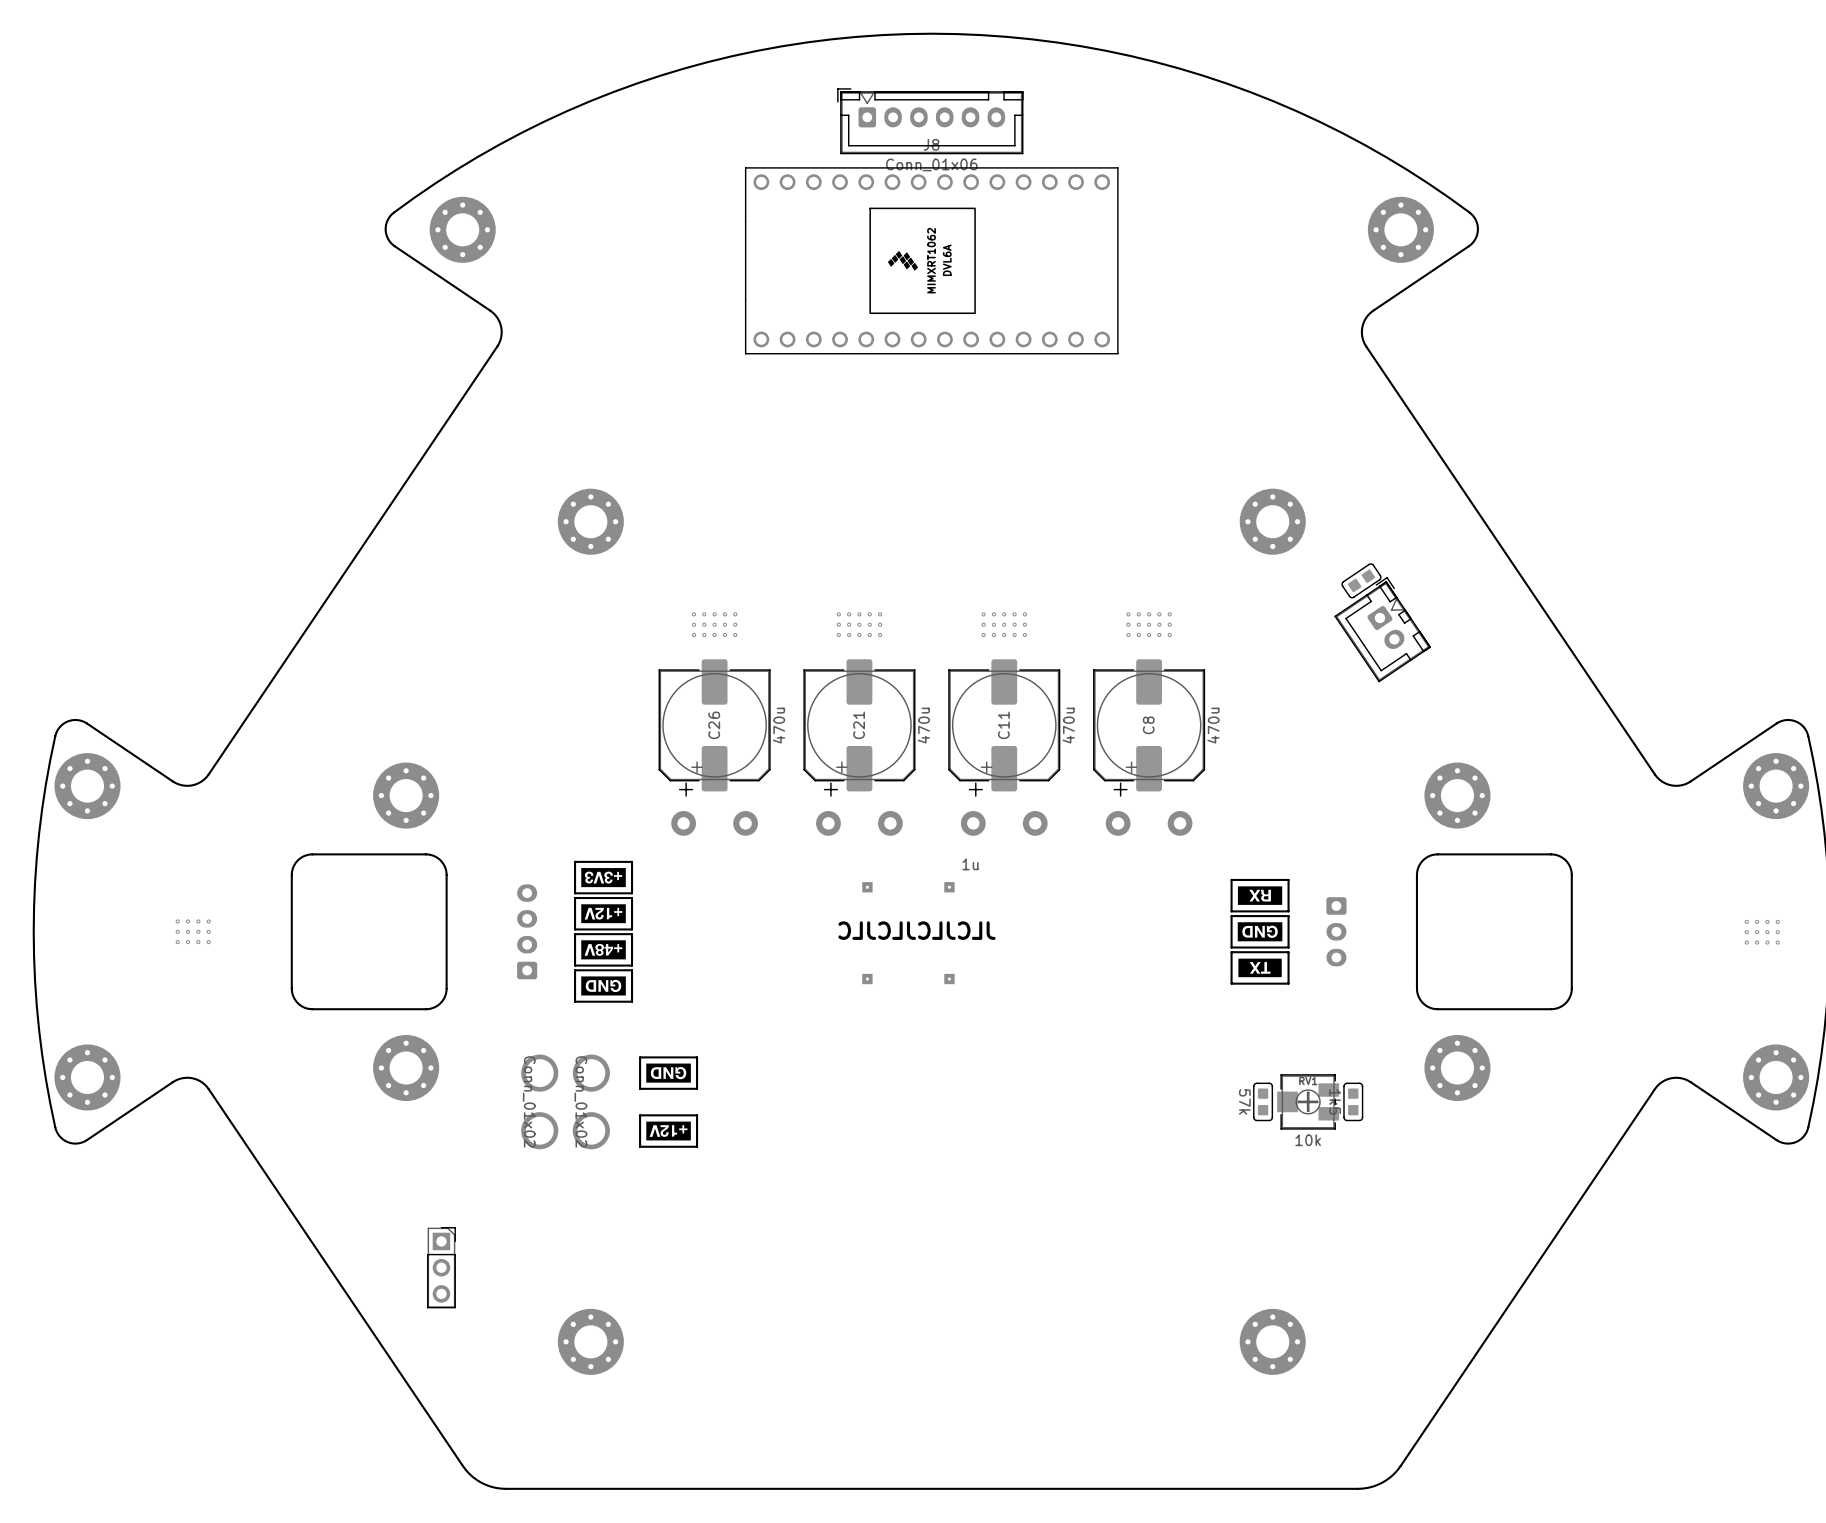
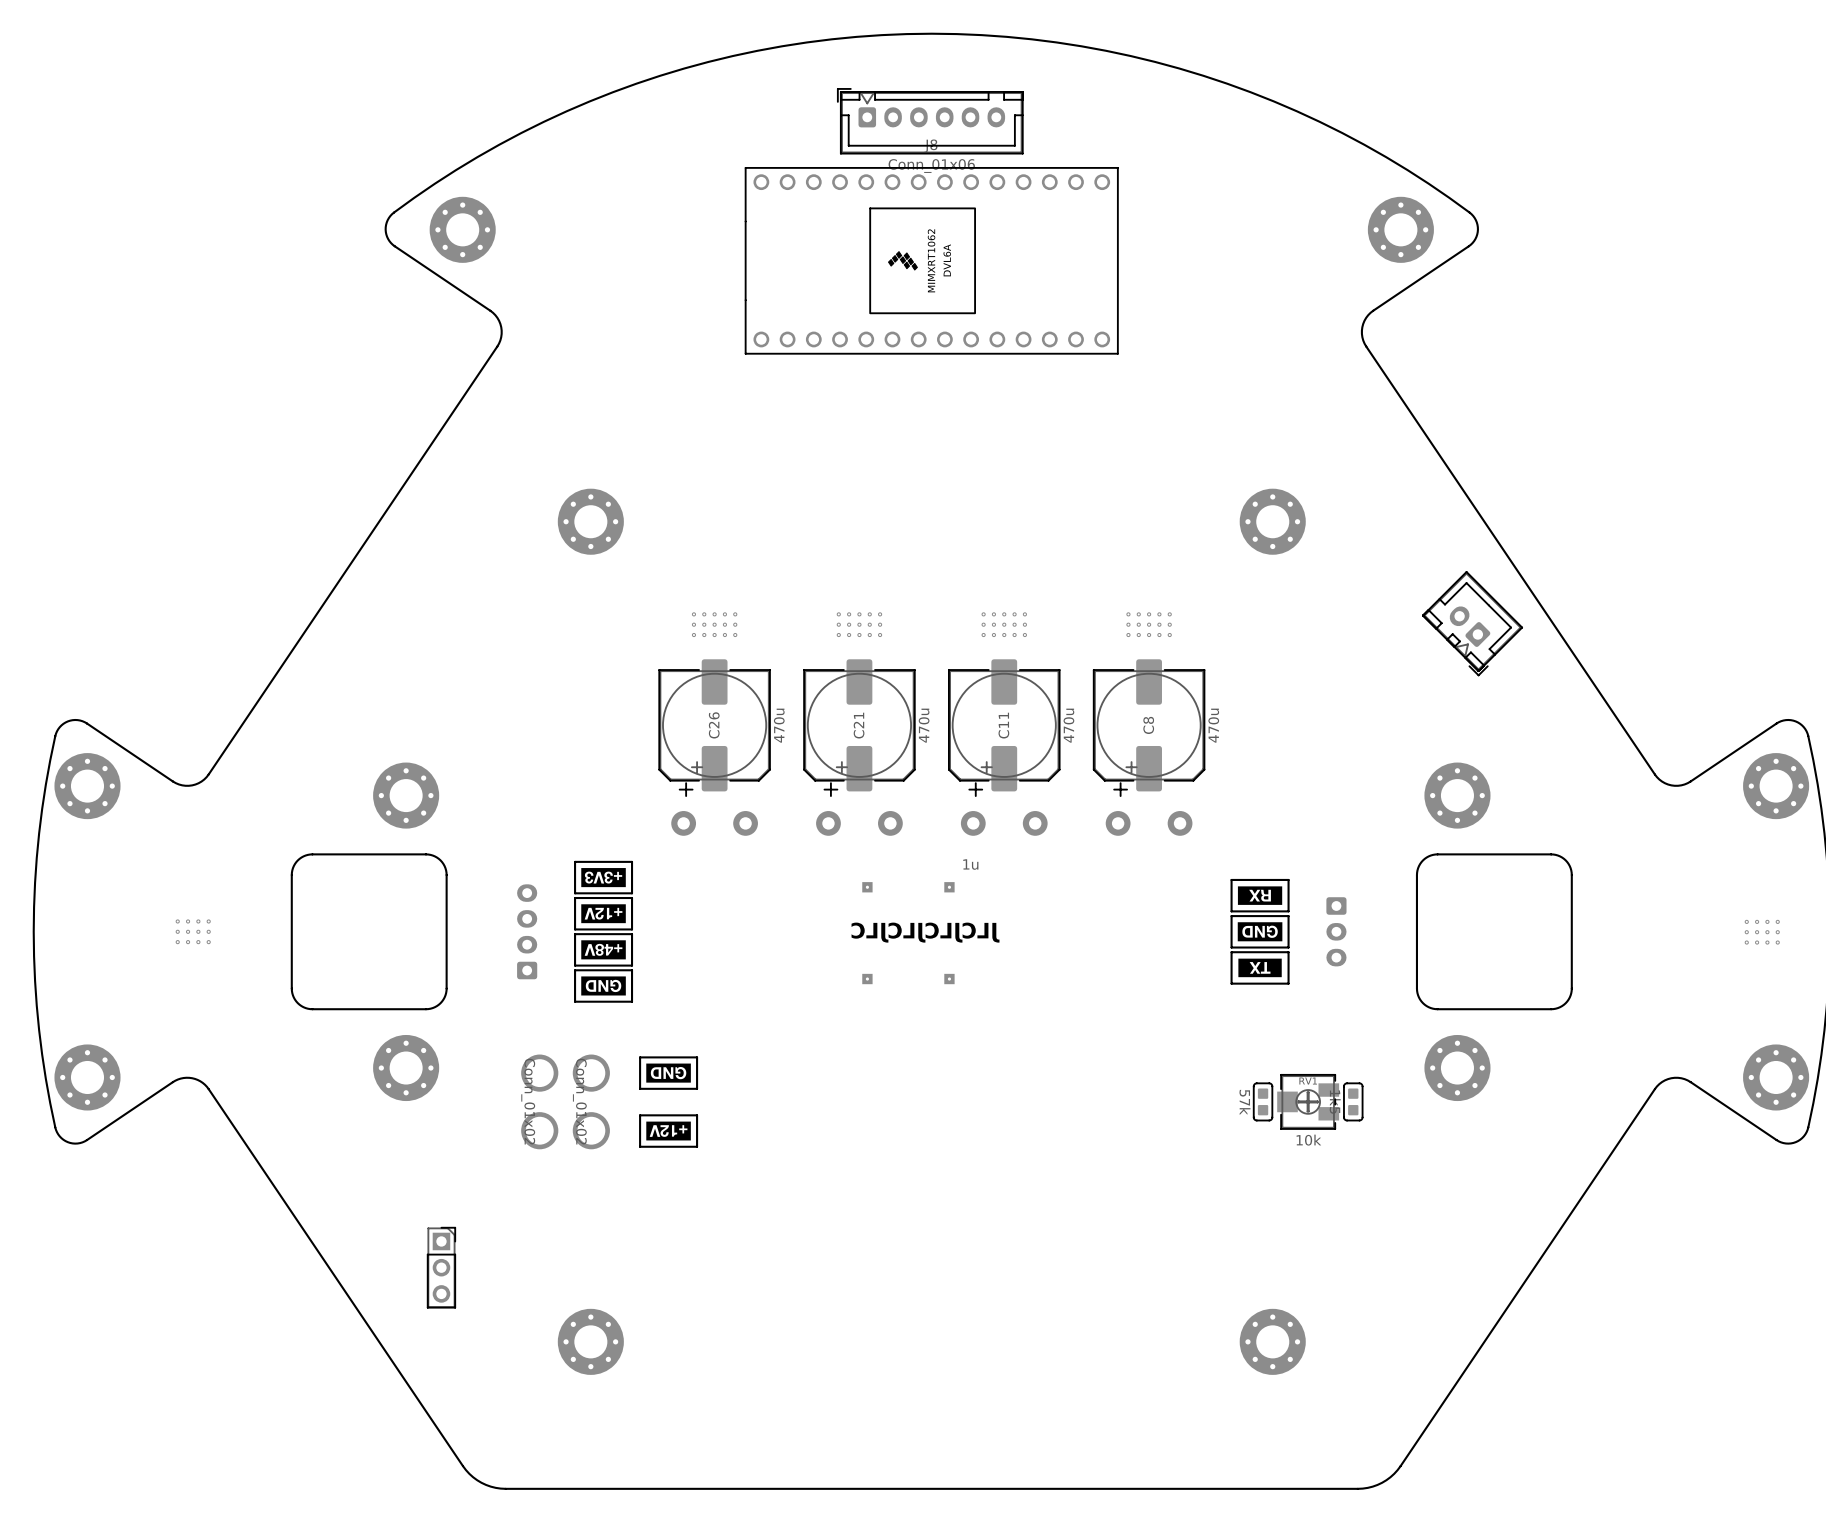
part: (1361, 580) -> none
part: none -> (1472, 623)
part: (1382, 629) -> none

